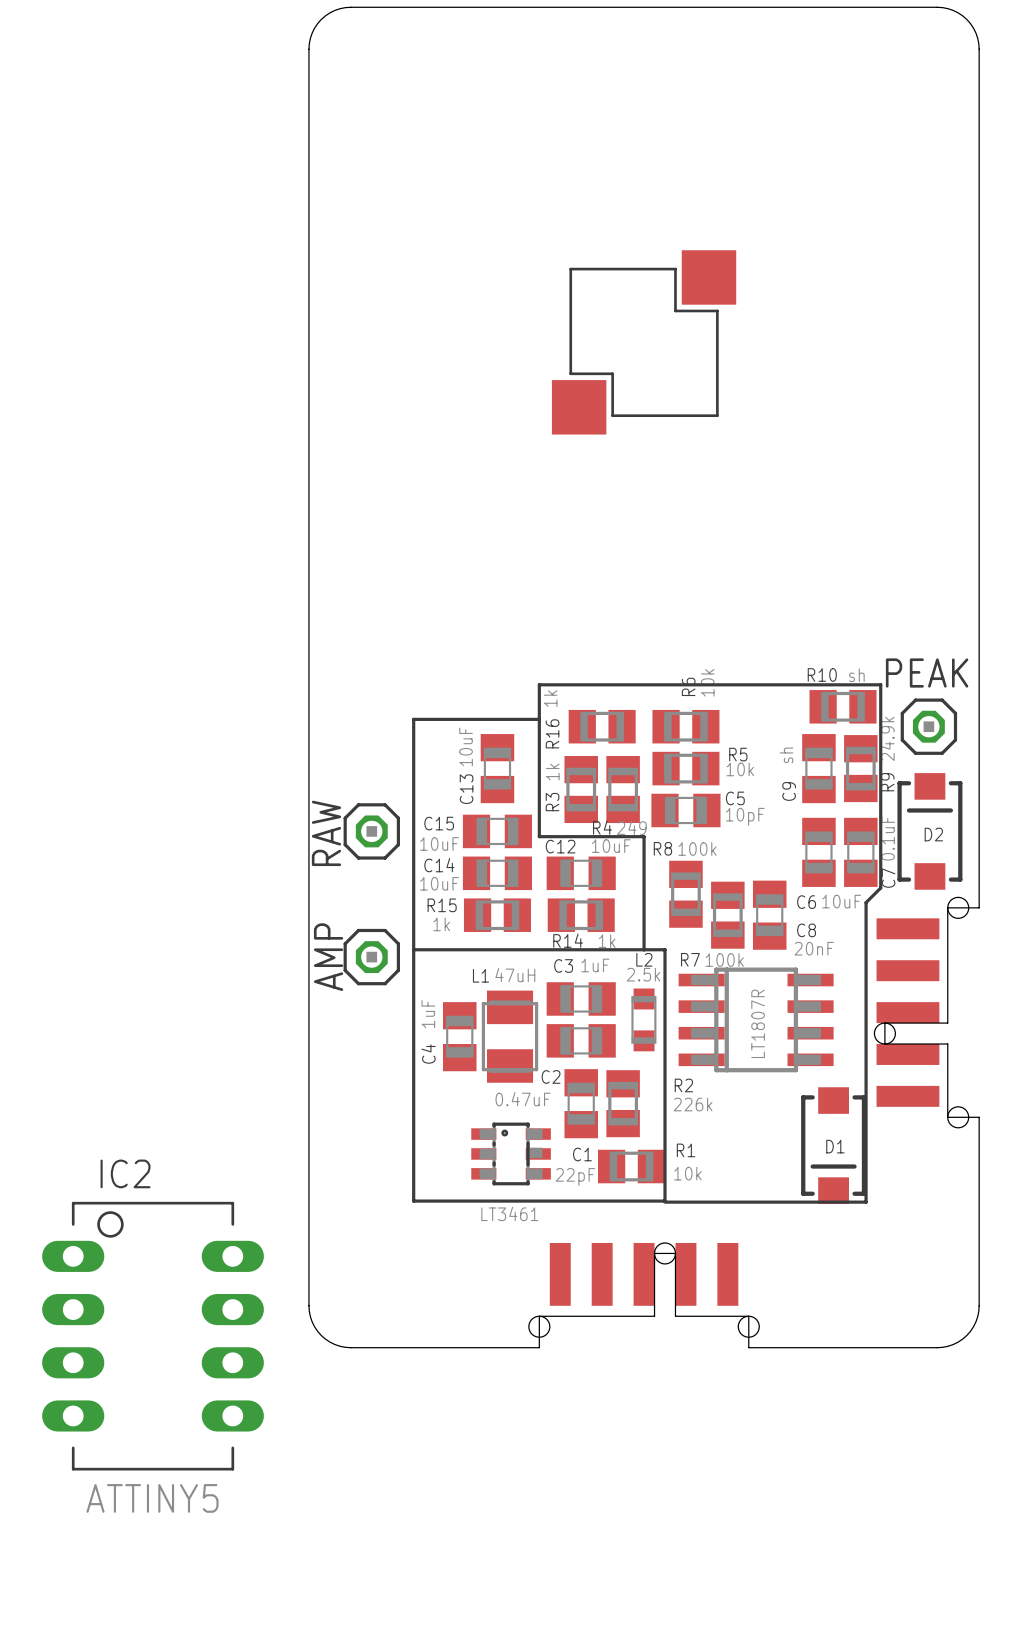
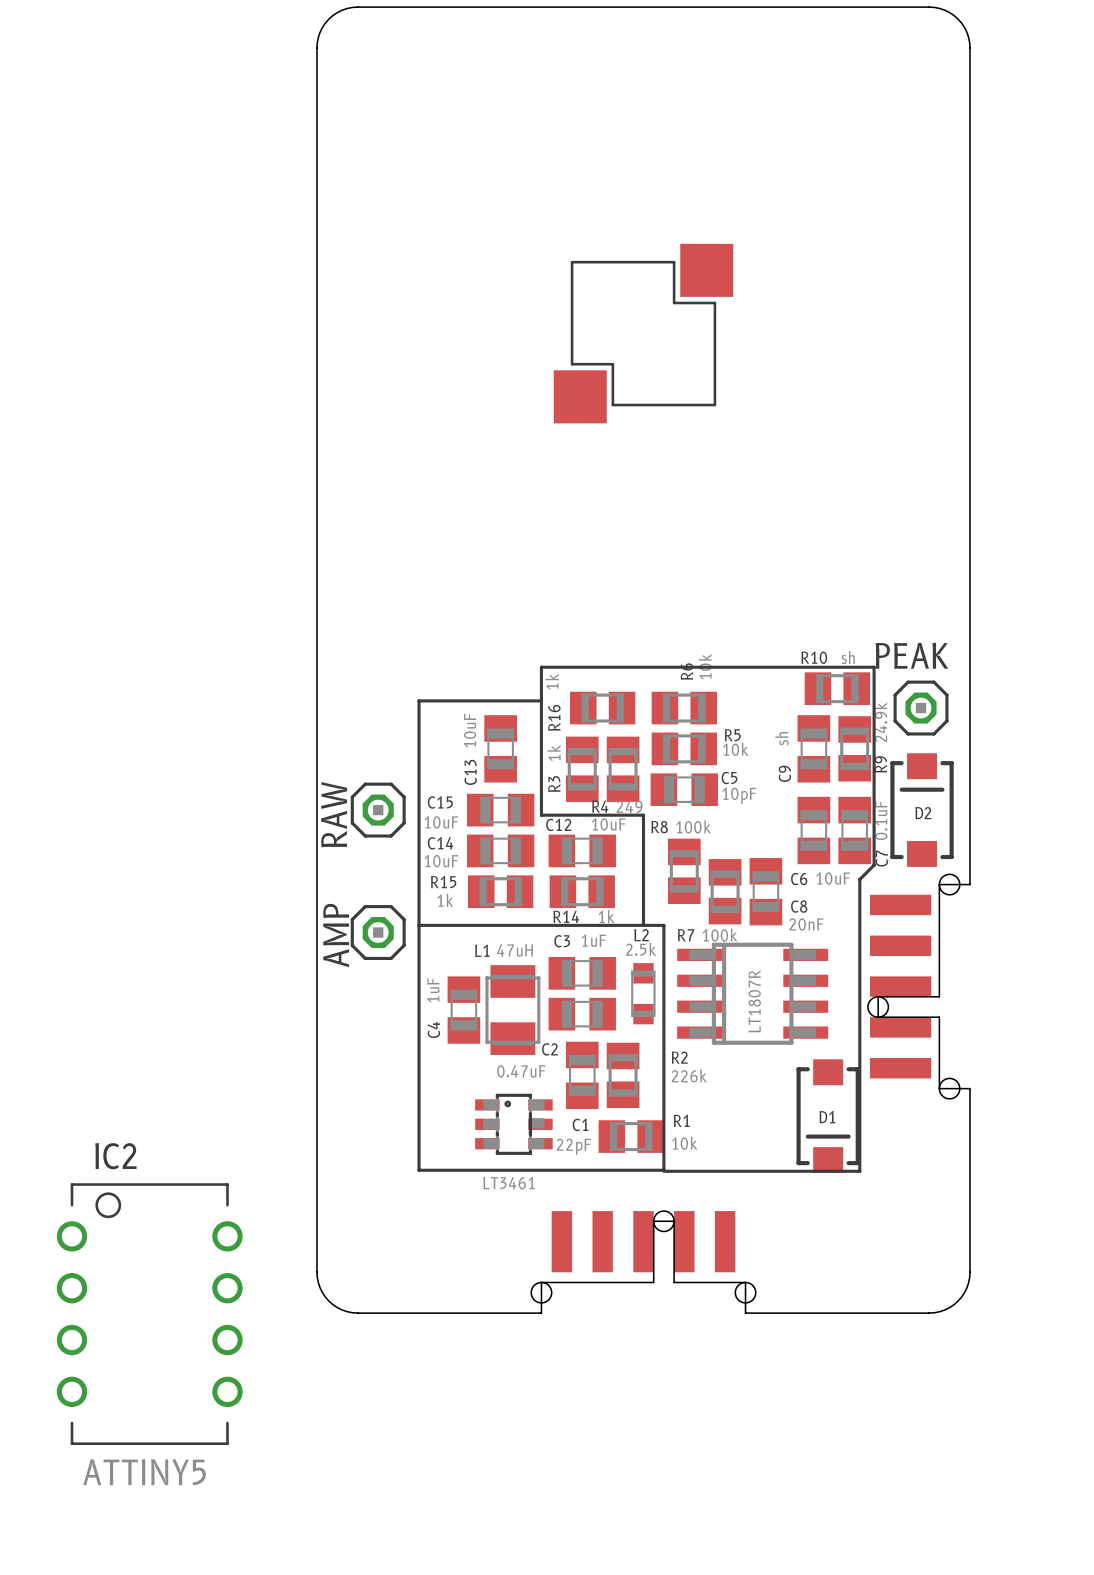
IC2 footprint: [42, 1201, 264, 1471] -> [56, 1183, 243, 1445]

